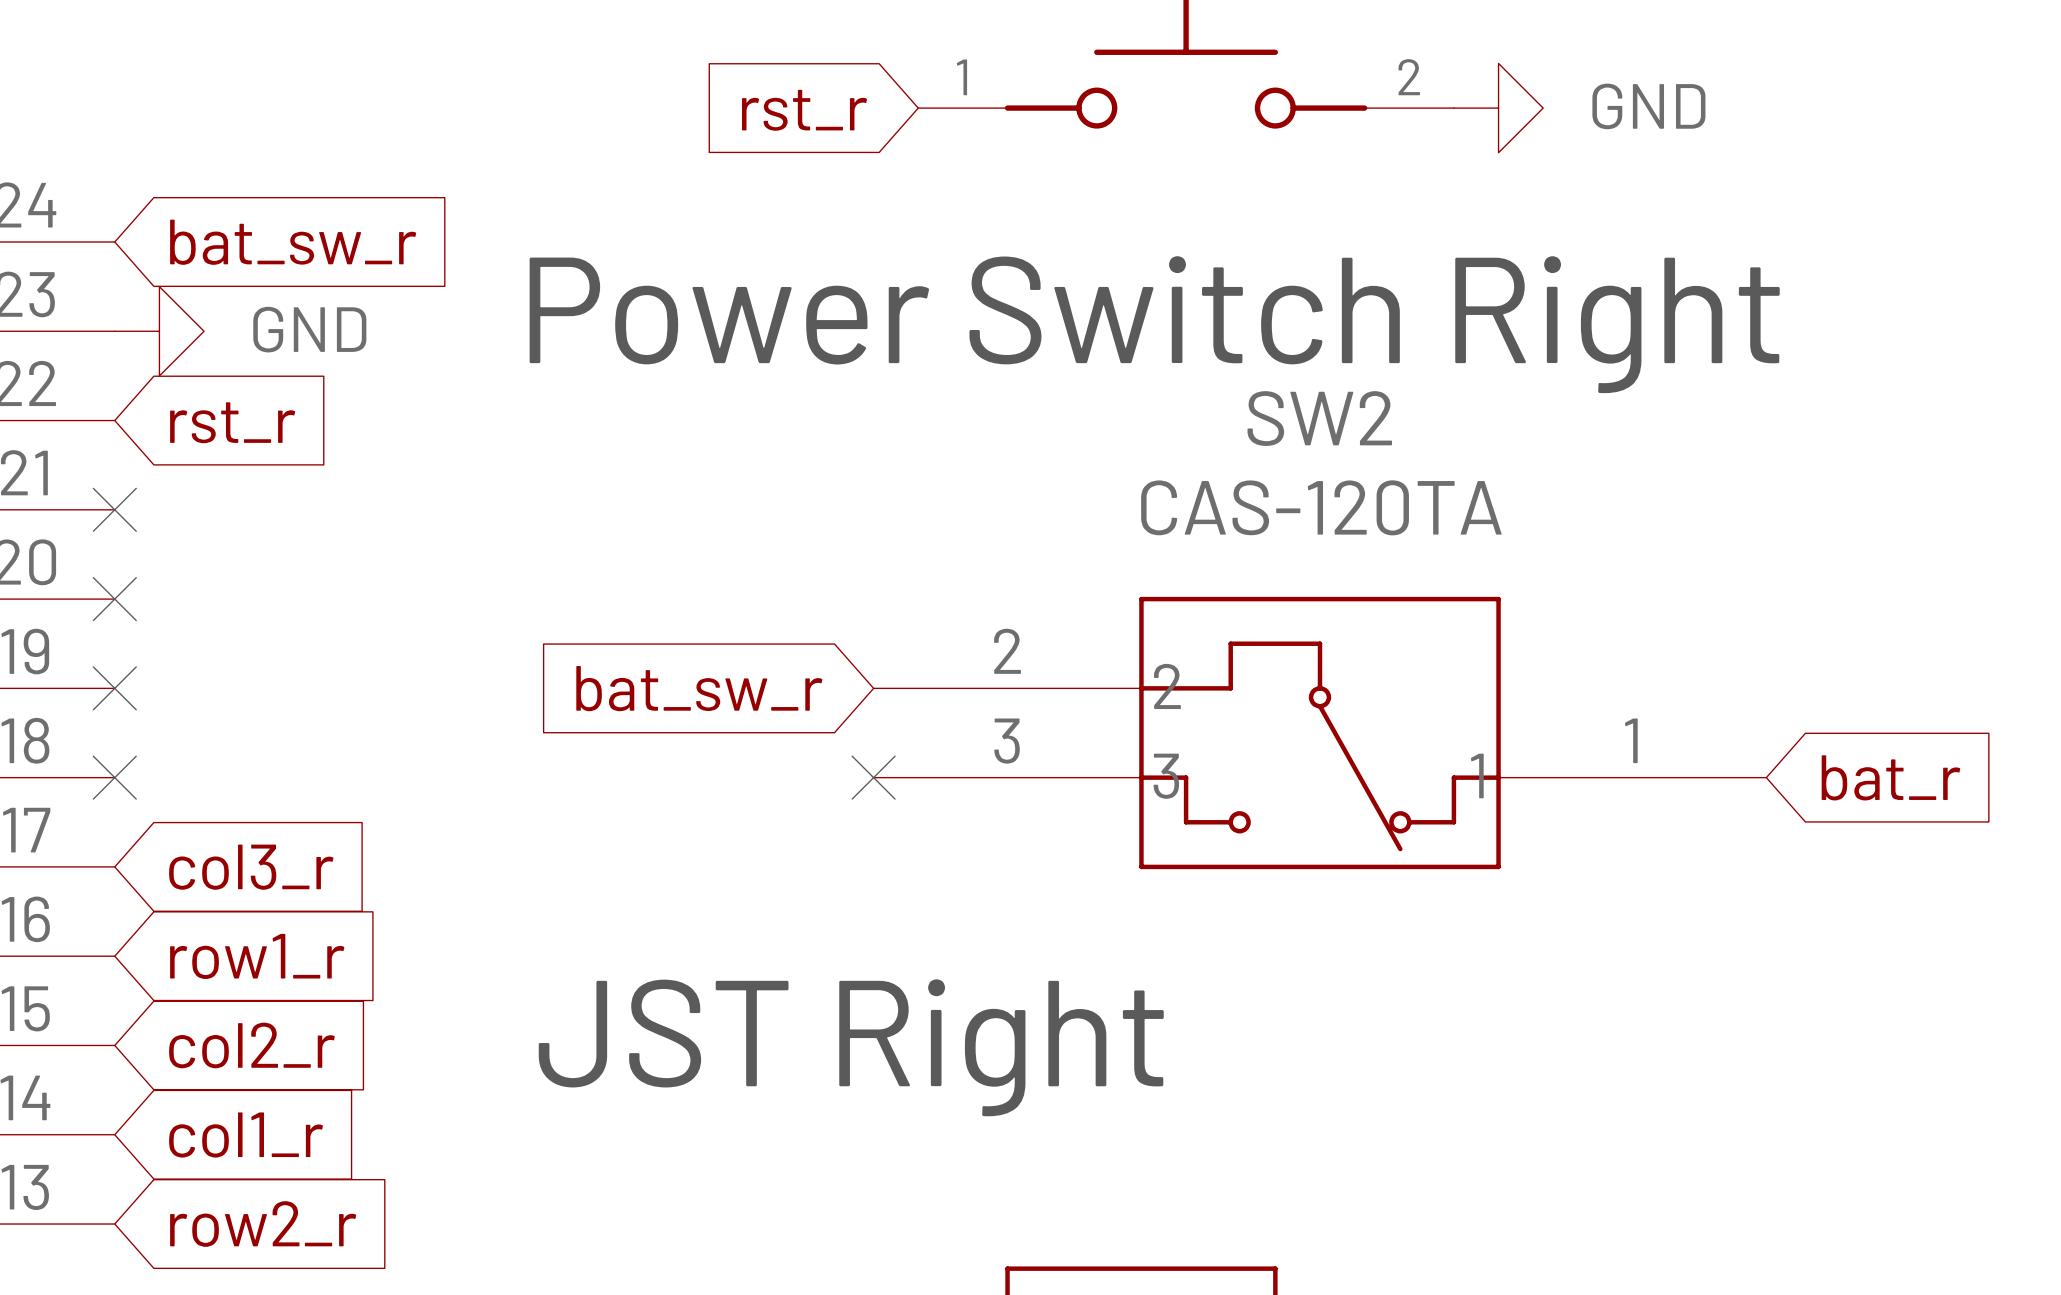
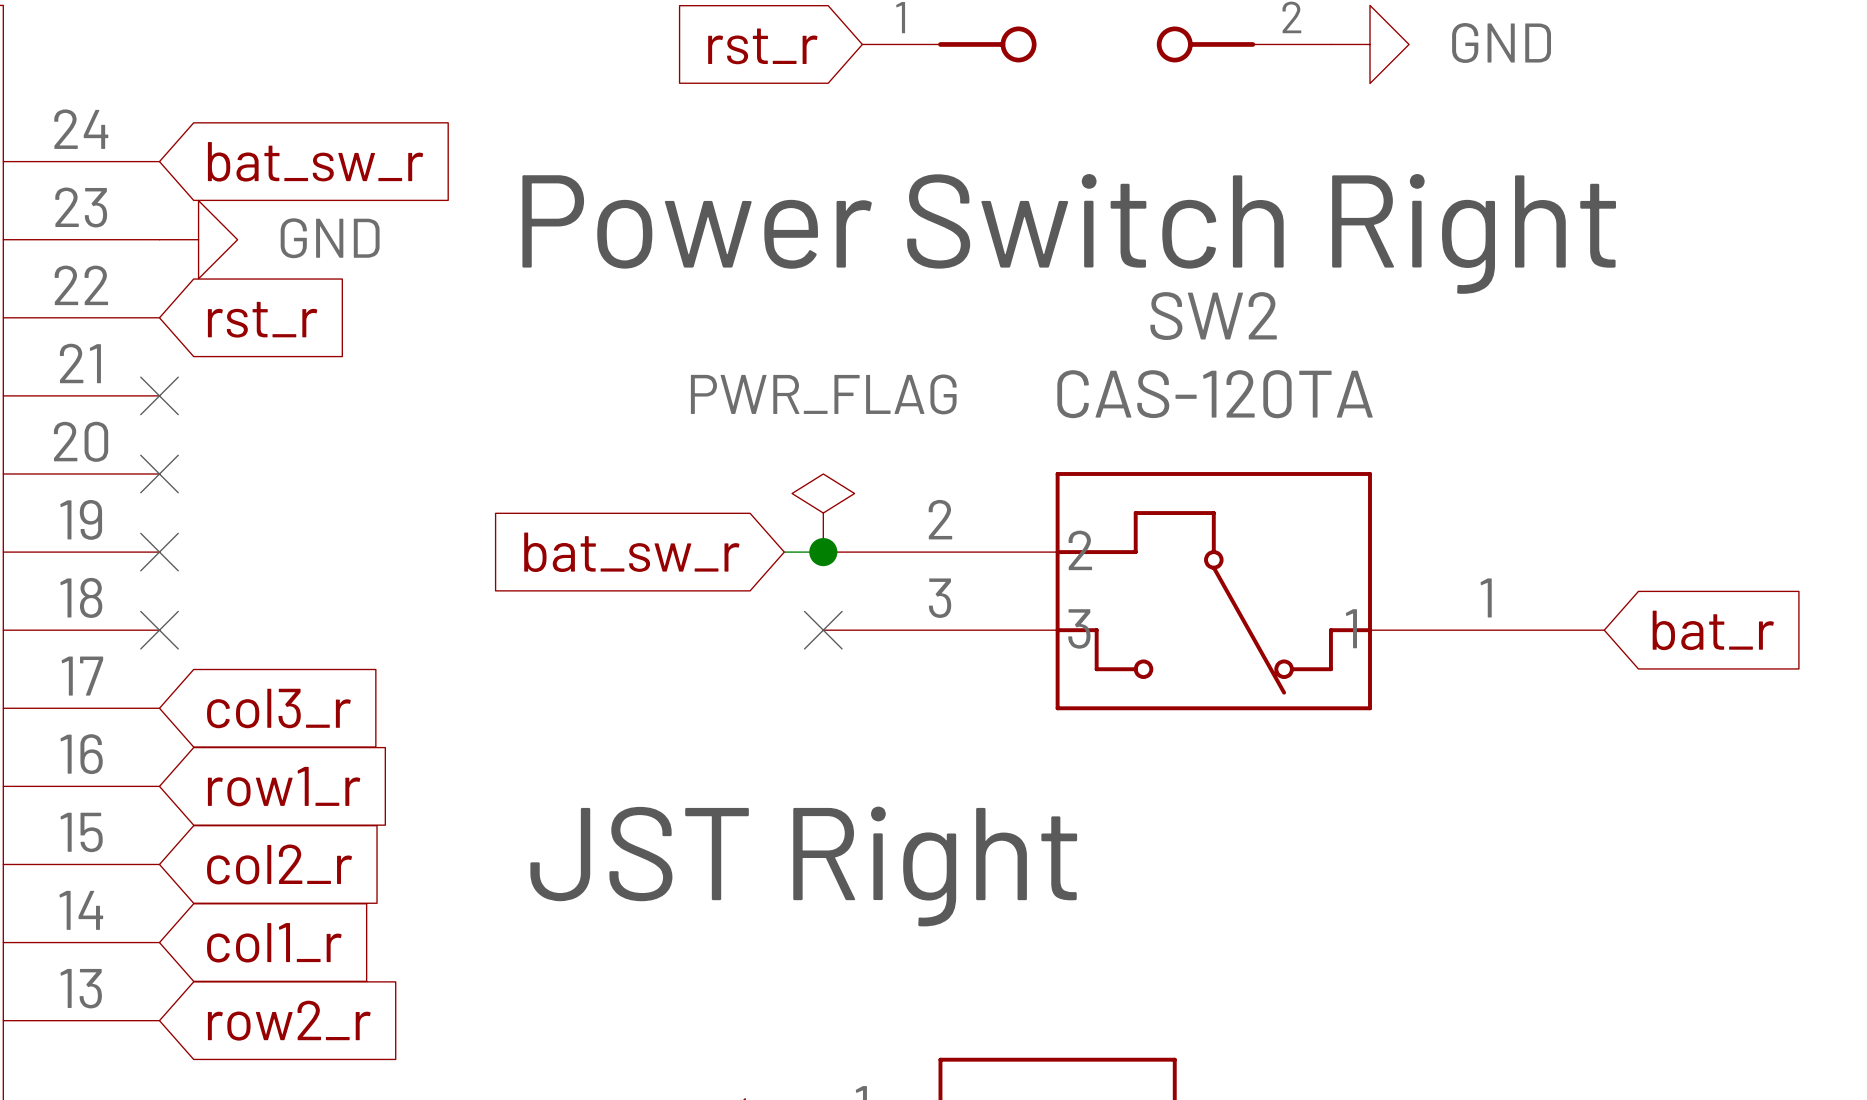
power symbol: none -> PWR_FLAG (823, 513)
global label position: bat_sw_r (699, 688) -> bat_sw_r (631, 552)
wire: none -> (784, 552) (823, 552)
junction: none -> (823, 552)

